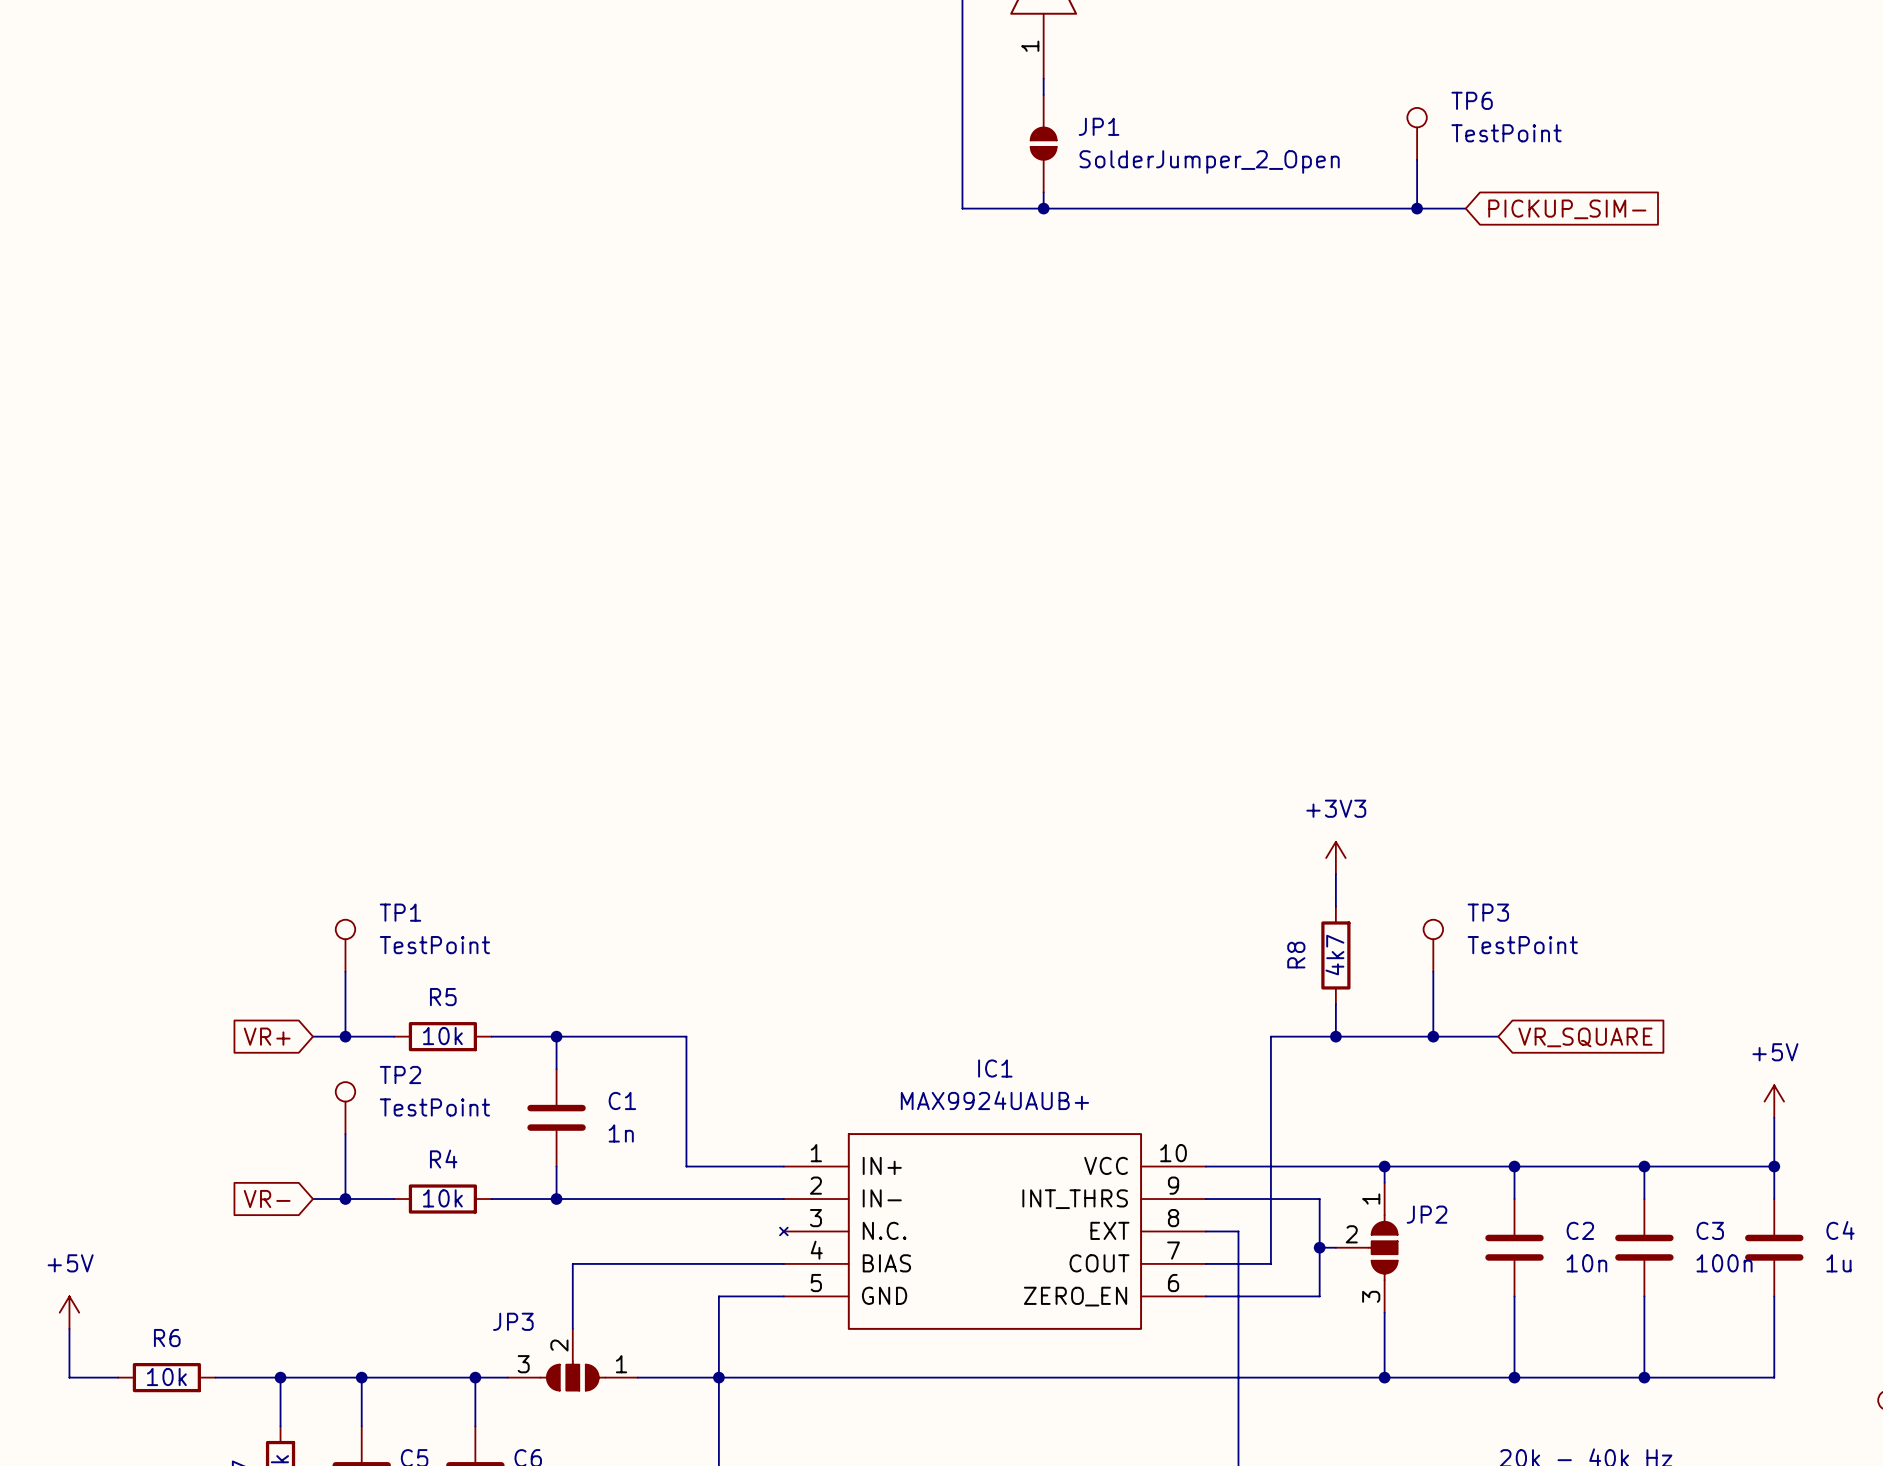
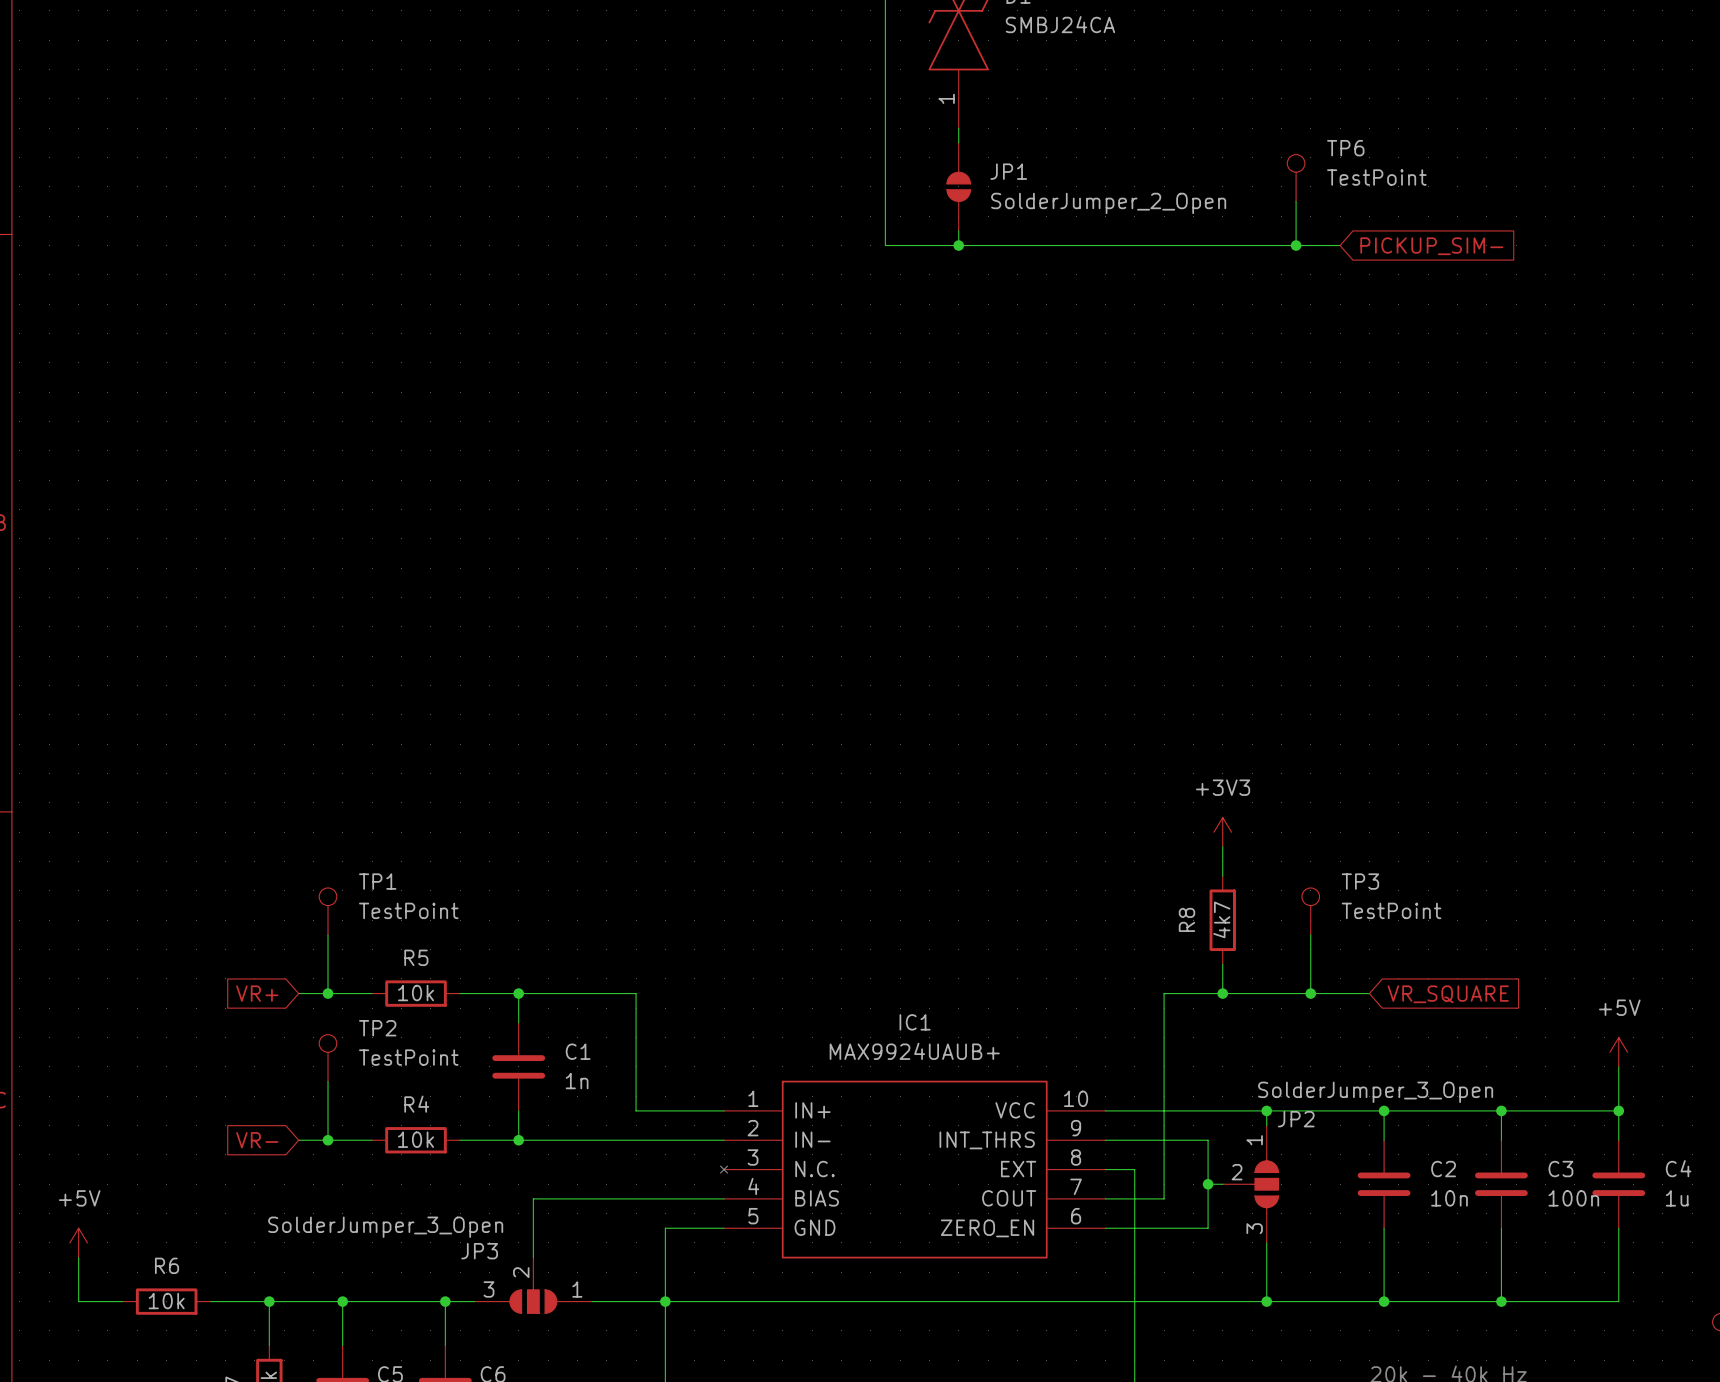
JP2 value: none -> SolderJumper_3_Open (1375, 1092)
JP2 name position: JP2 (1427, 1214) -> JP2 (1296, 1119)
JP3 value: none -> SolderJumper_3_Open (385, 1227)

